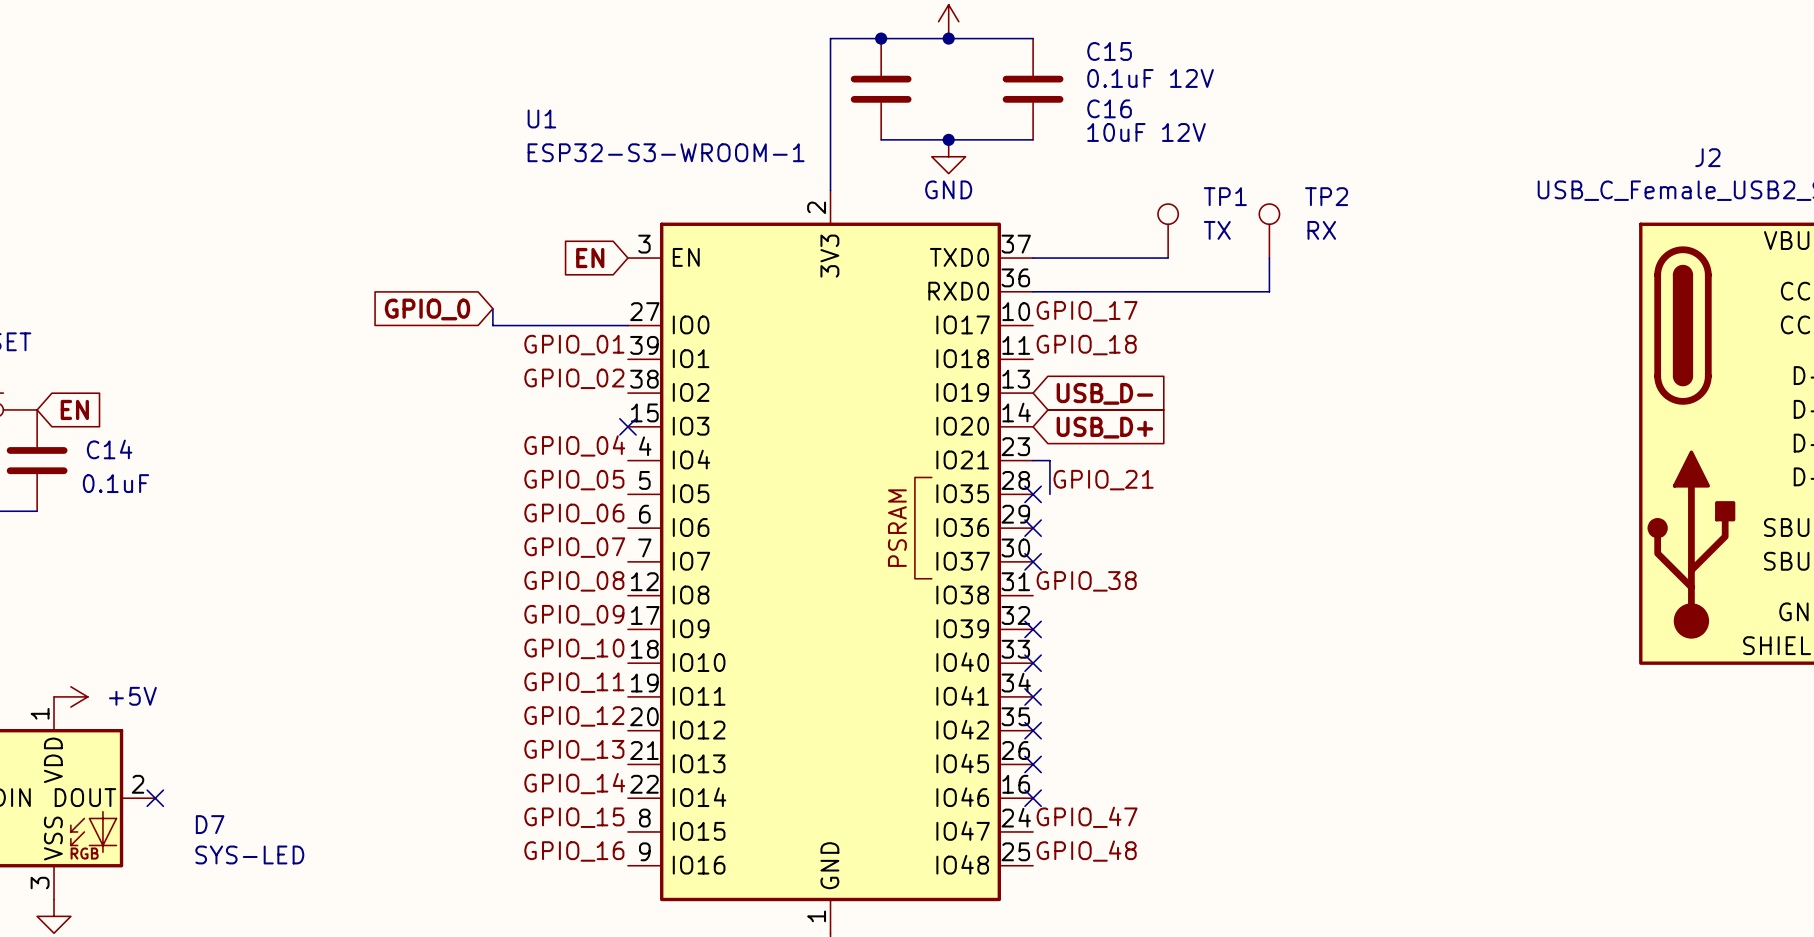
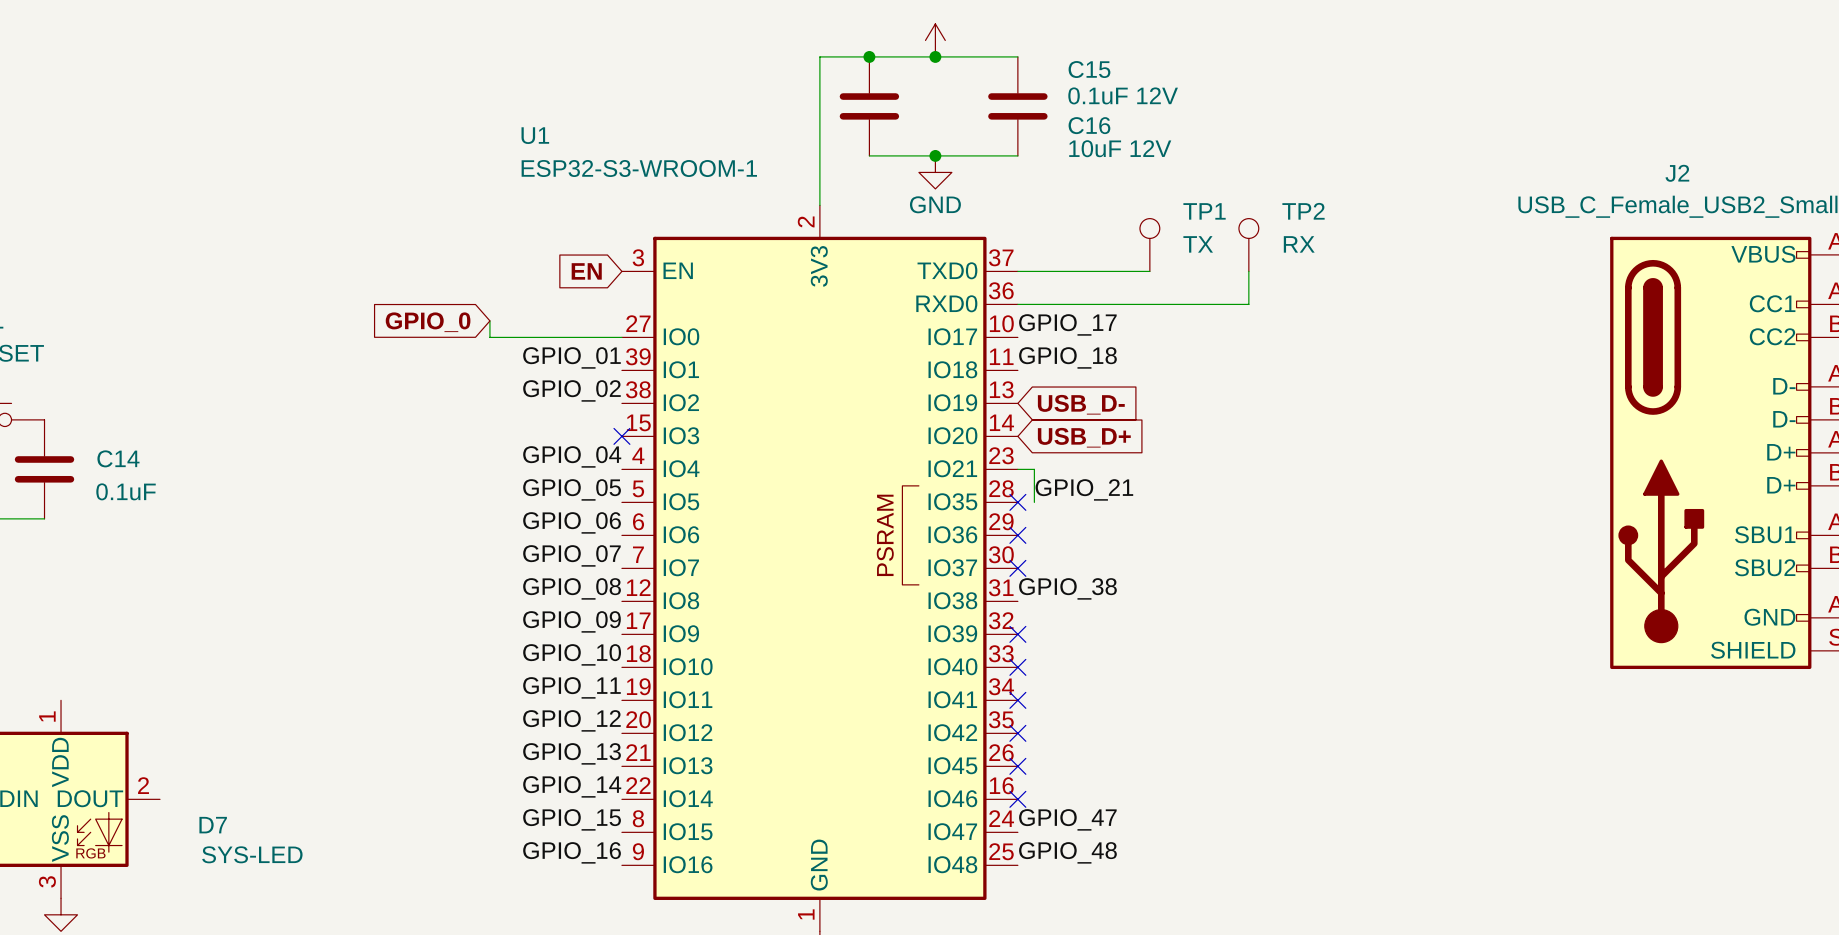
global label: EN (74, 409) -> none
power symbol: +5V (70, 696) -> none
no-connect mark: (155, 798) -> none

